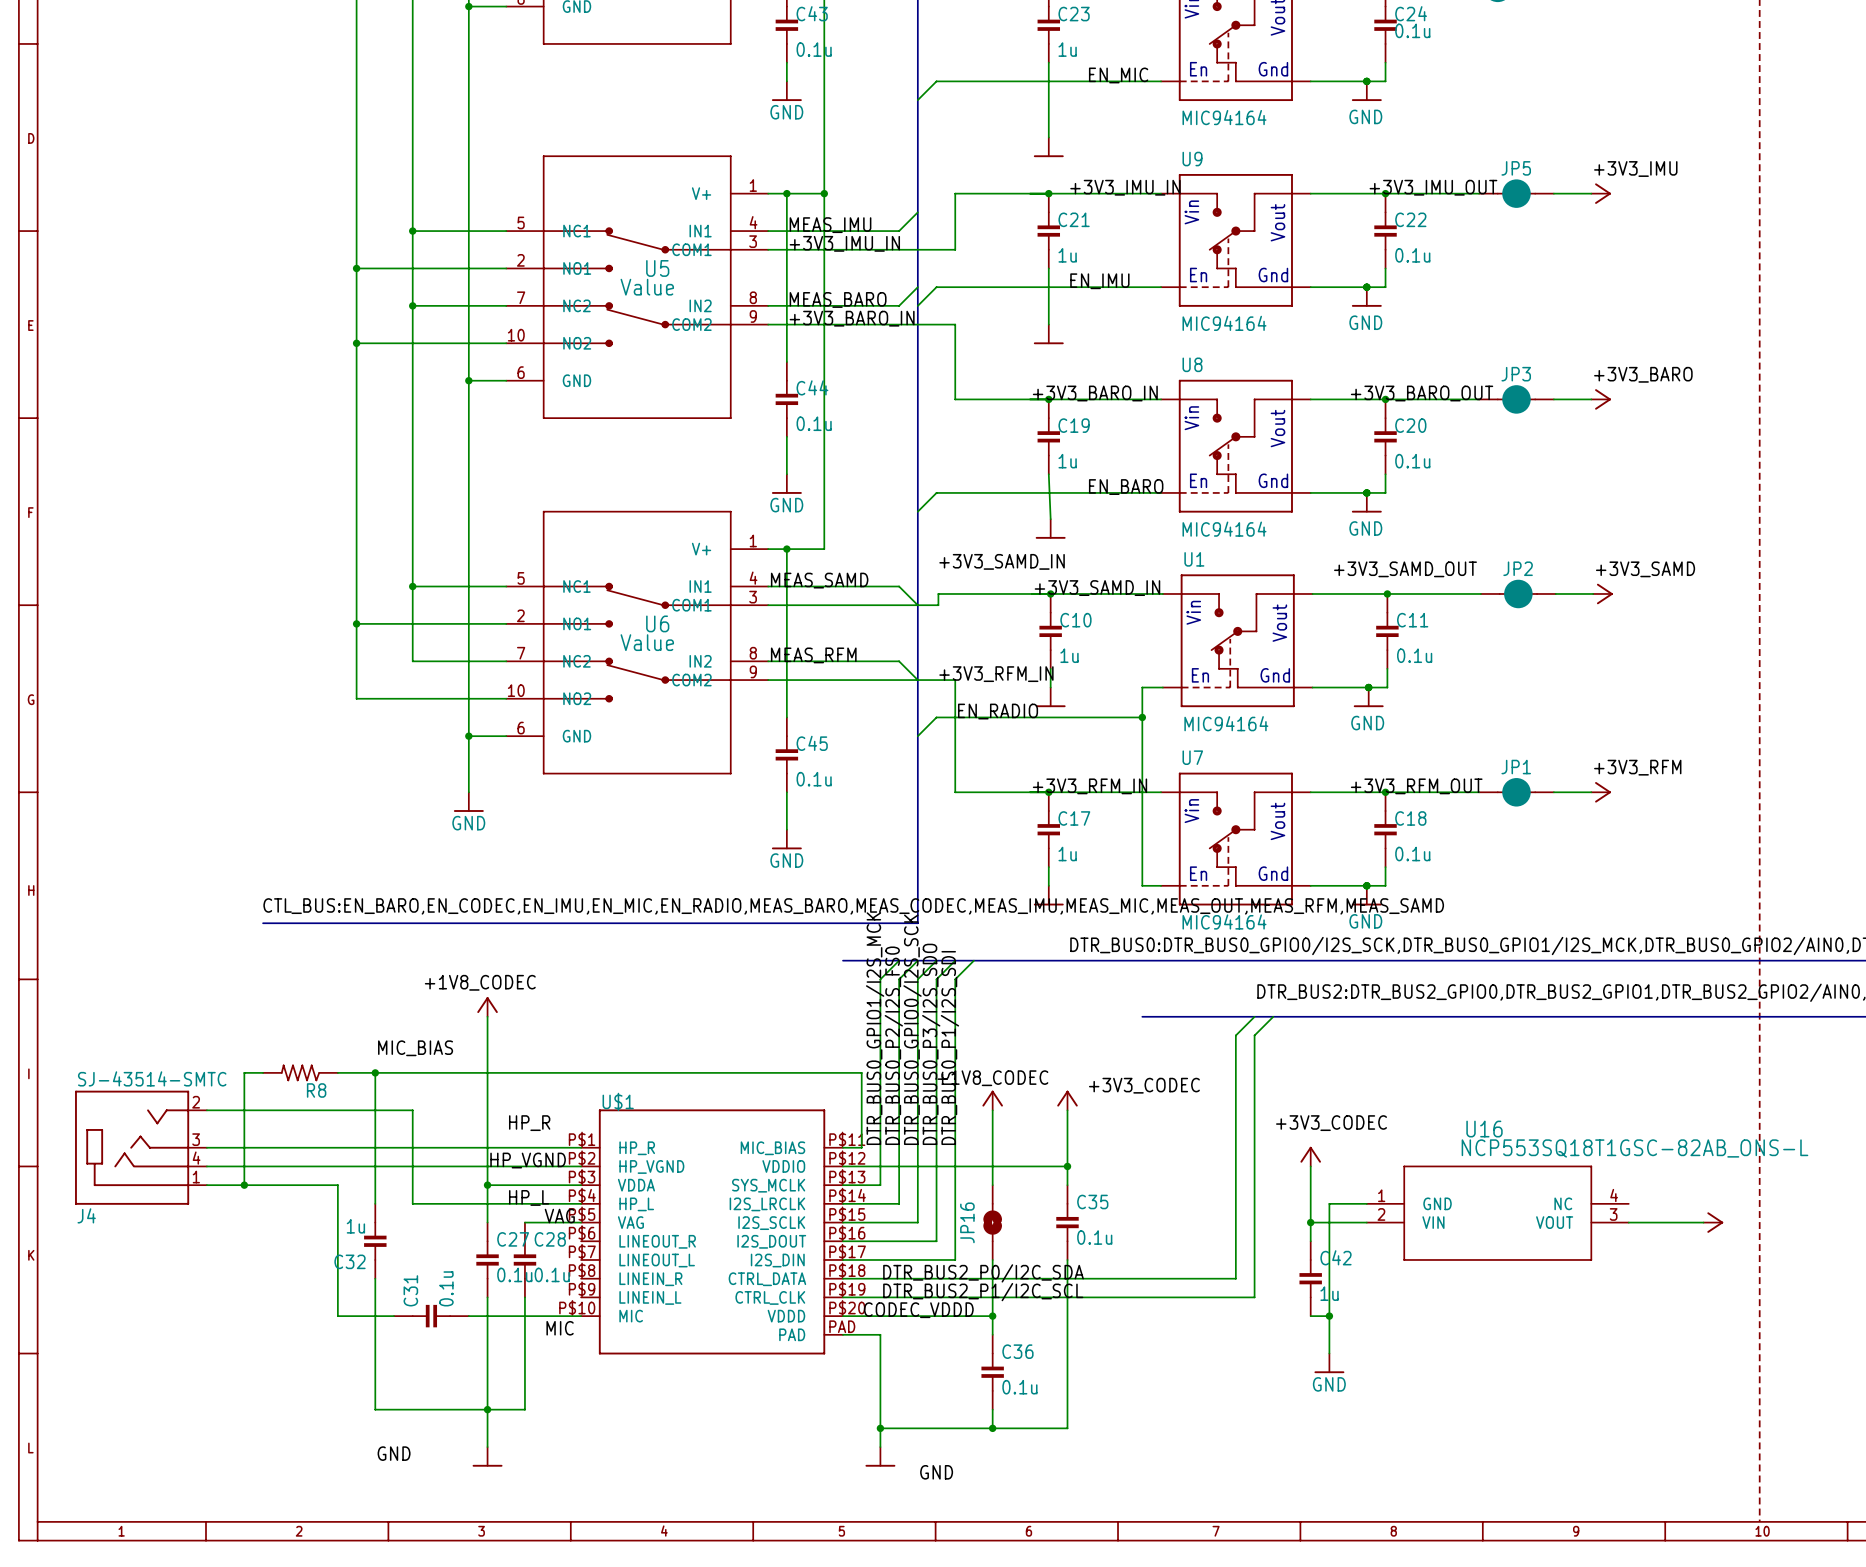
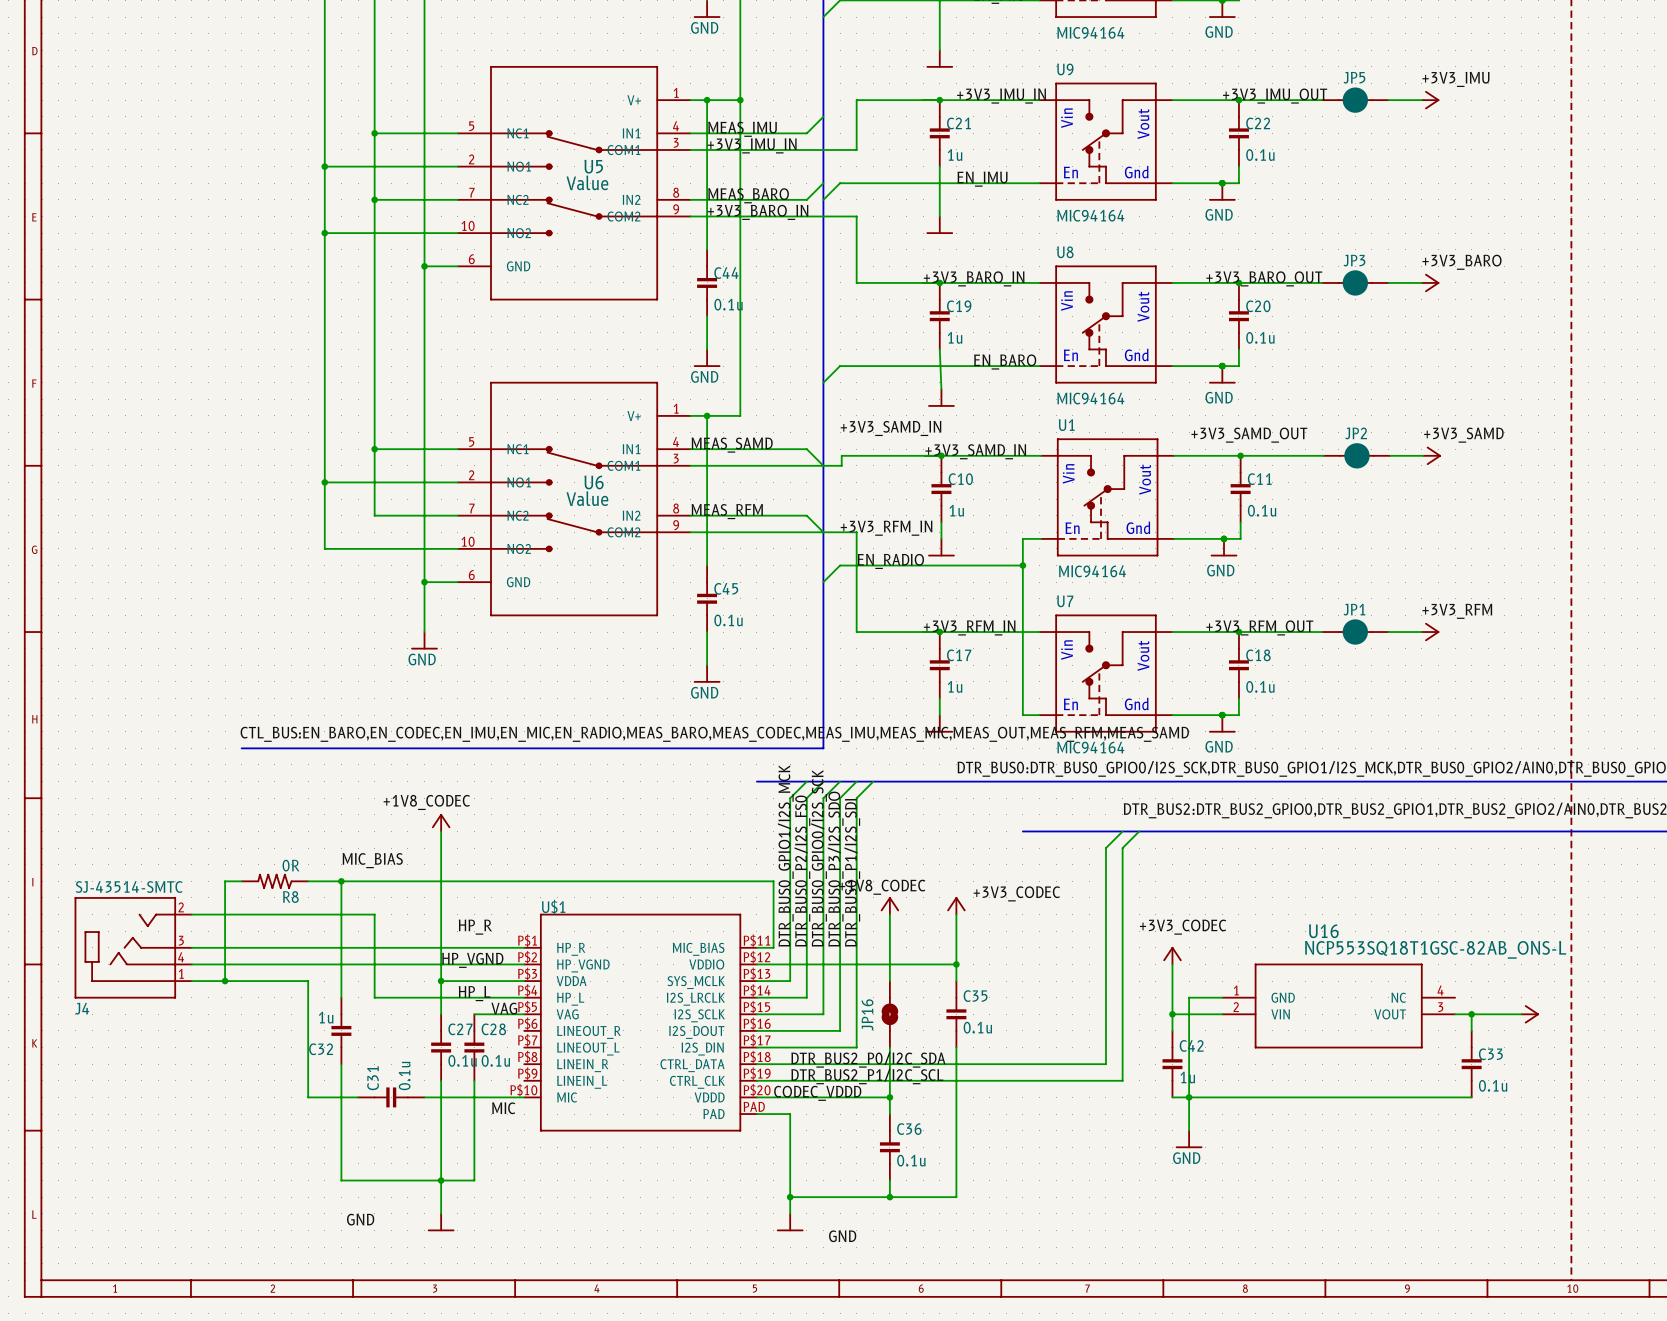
R8 value: none -> 0R (290, 865)
wire: none -> (1471, 1014) (1471, 1030)
junction: none -> (1471, 1014)
C33: none -> 0.1u (1471, 1064)
wire: none -> (1189, 1097) (1471, 1097)

